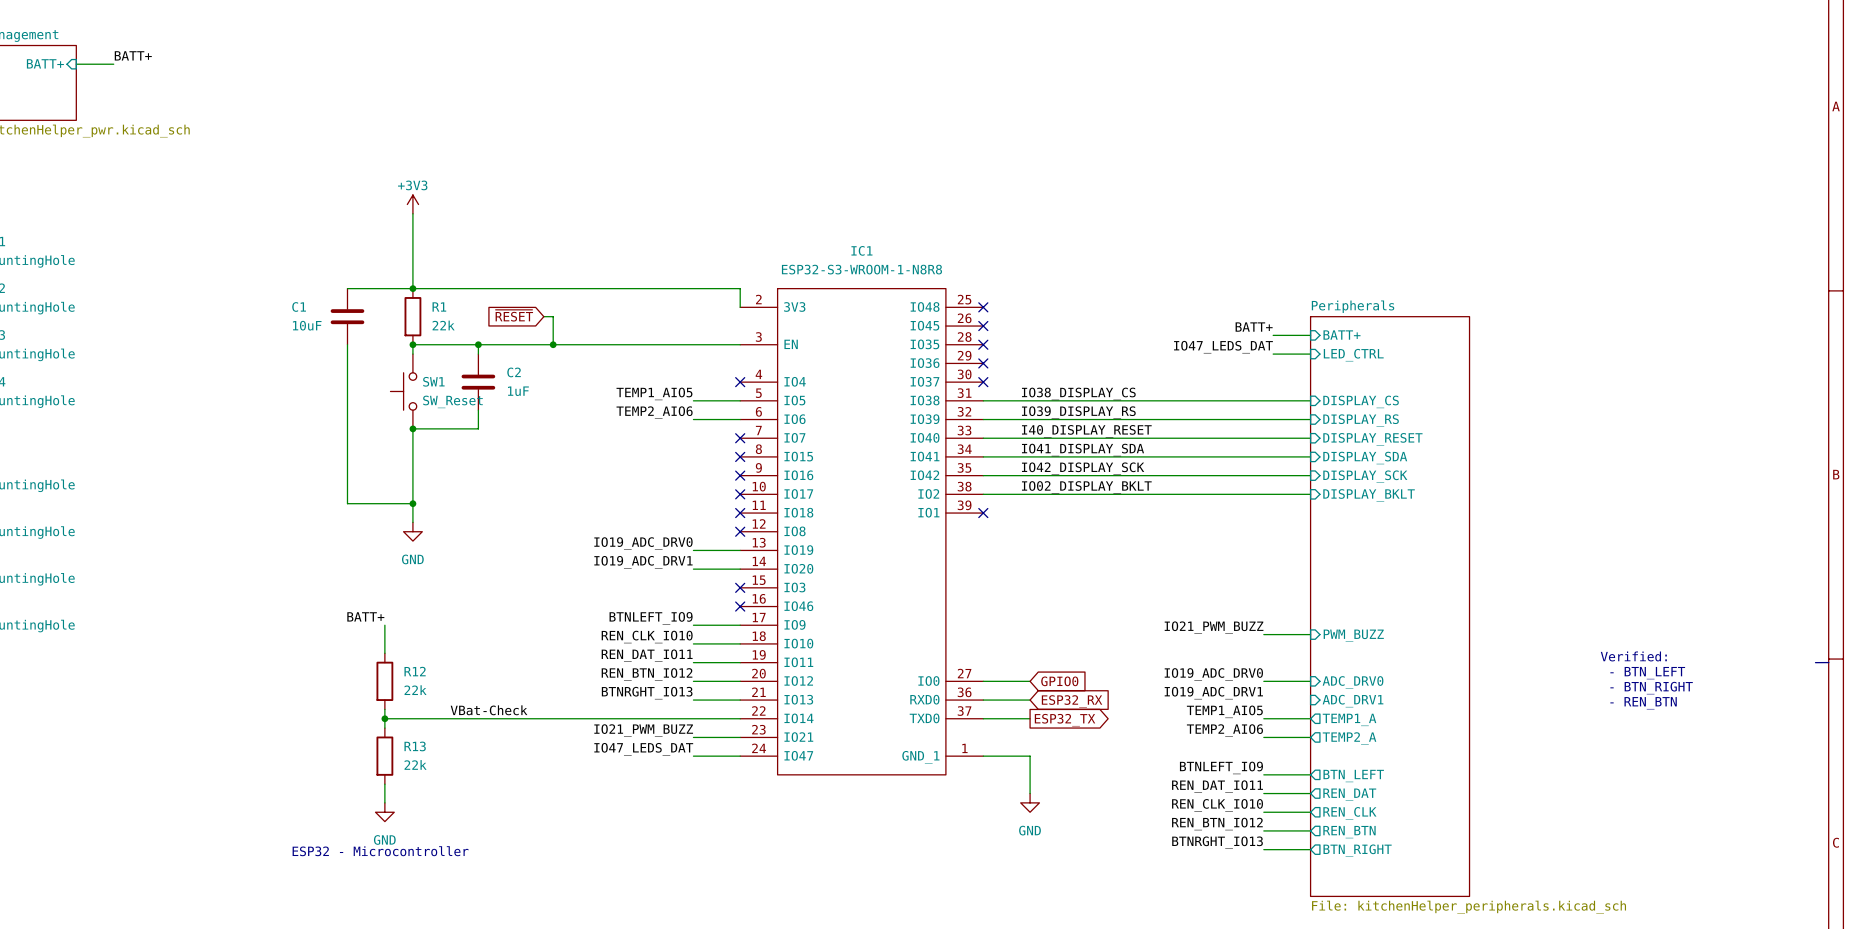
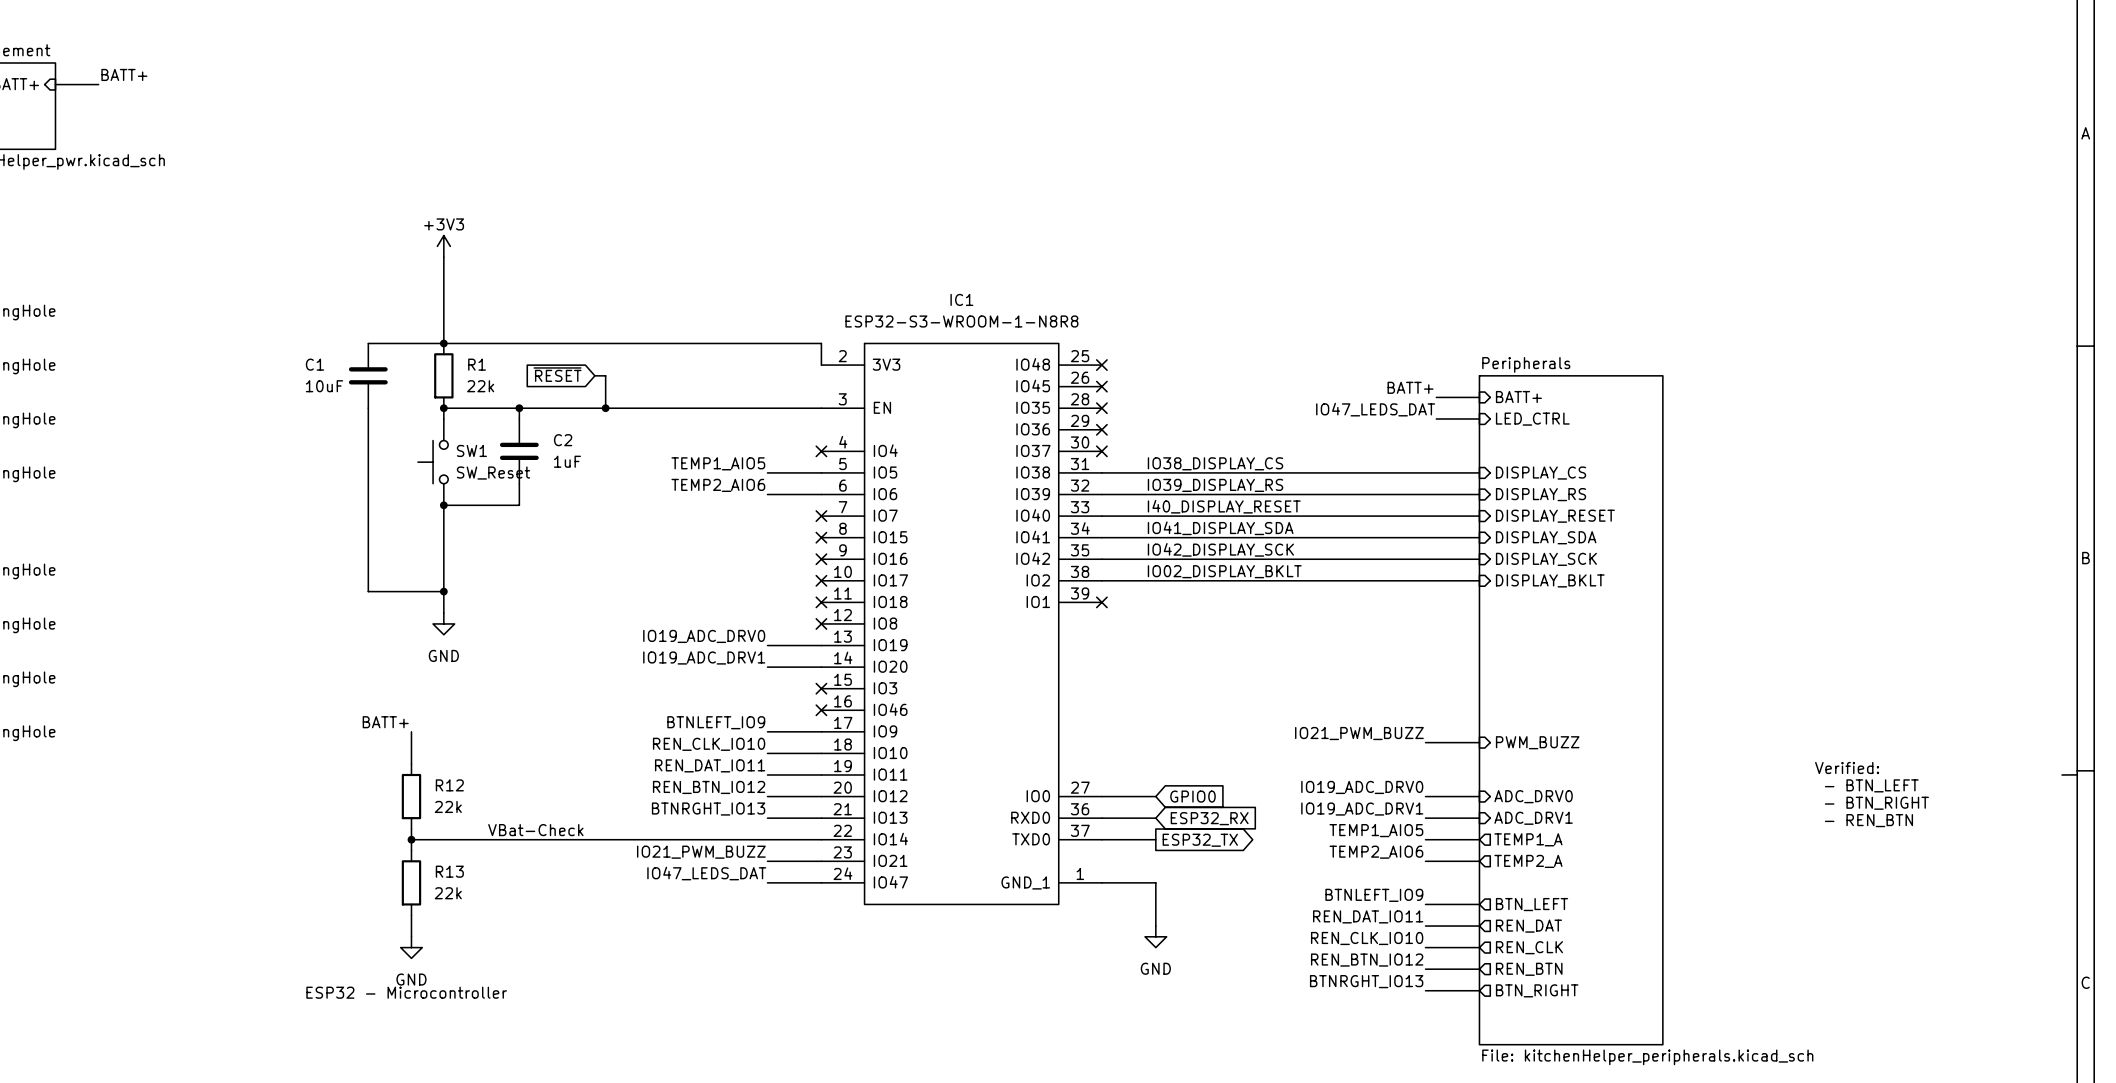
wire: none -> (1425, 818) (1479, 818)

